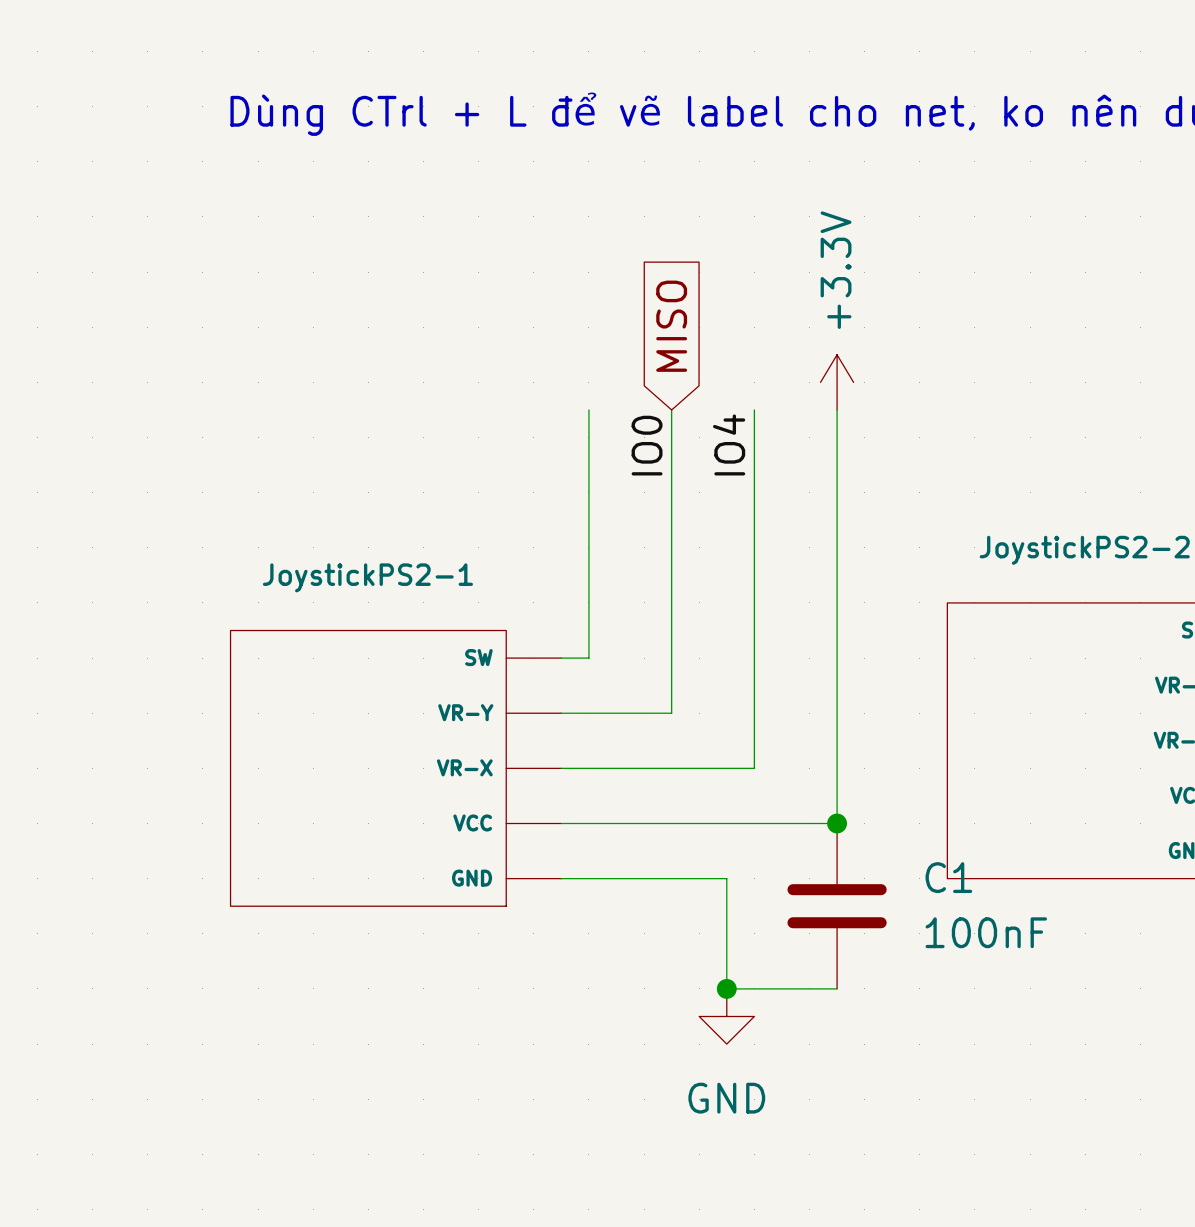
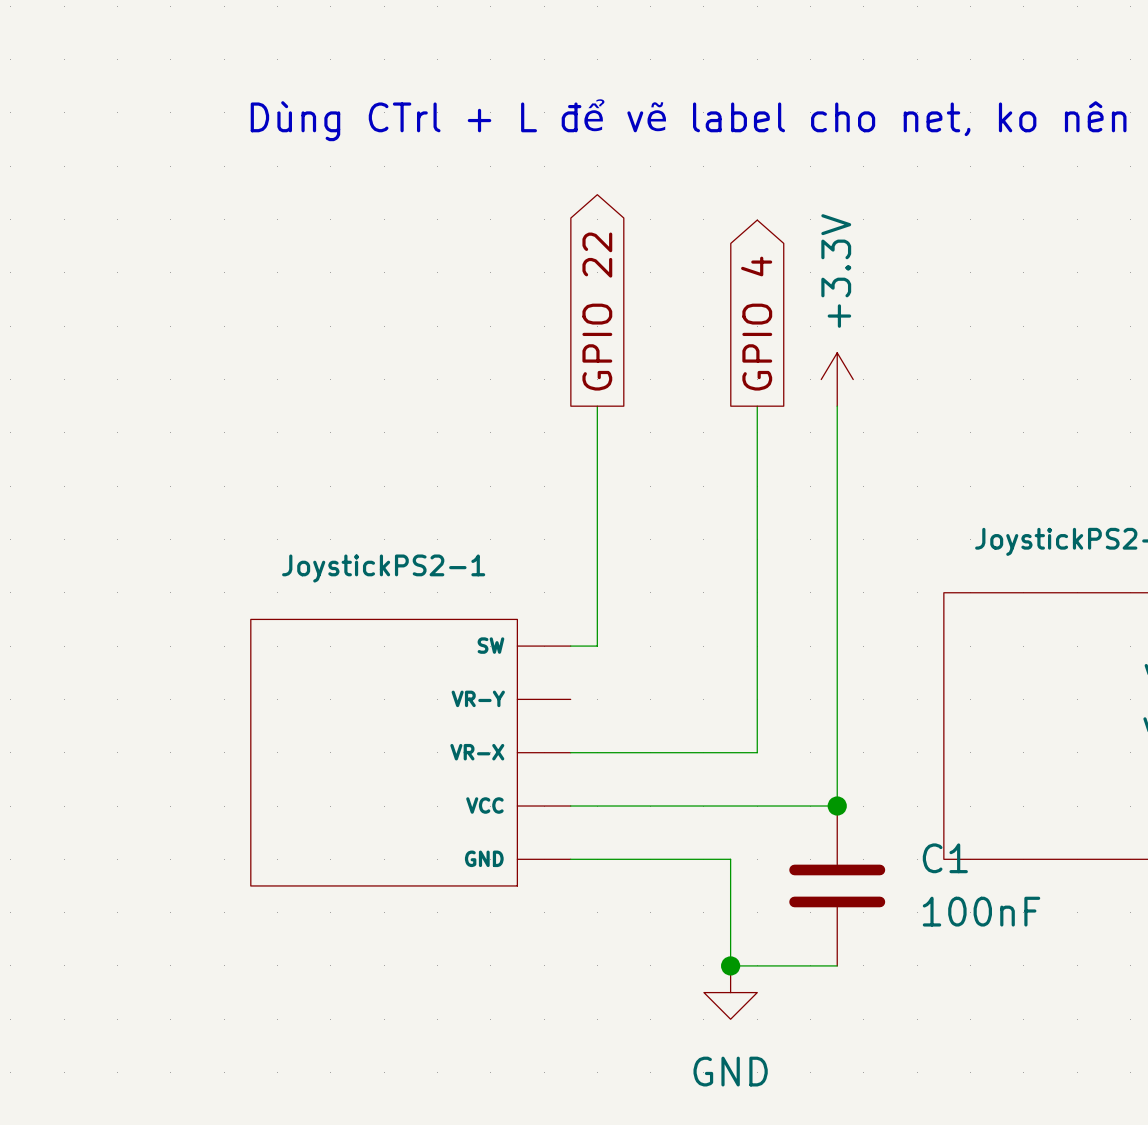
global label: none -> GPIO 22 (597, 311)
global label: none -> GPIO 4 (756, 323)
global label: MISO (671, 326) -> none
wire: (671, 409) (671, 713) (561, 713) -> none
label: IO4 (729, 444) -> none
label: IO0 (647, 445) -> none

